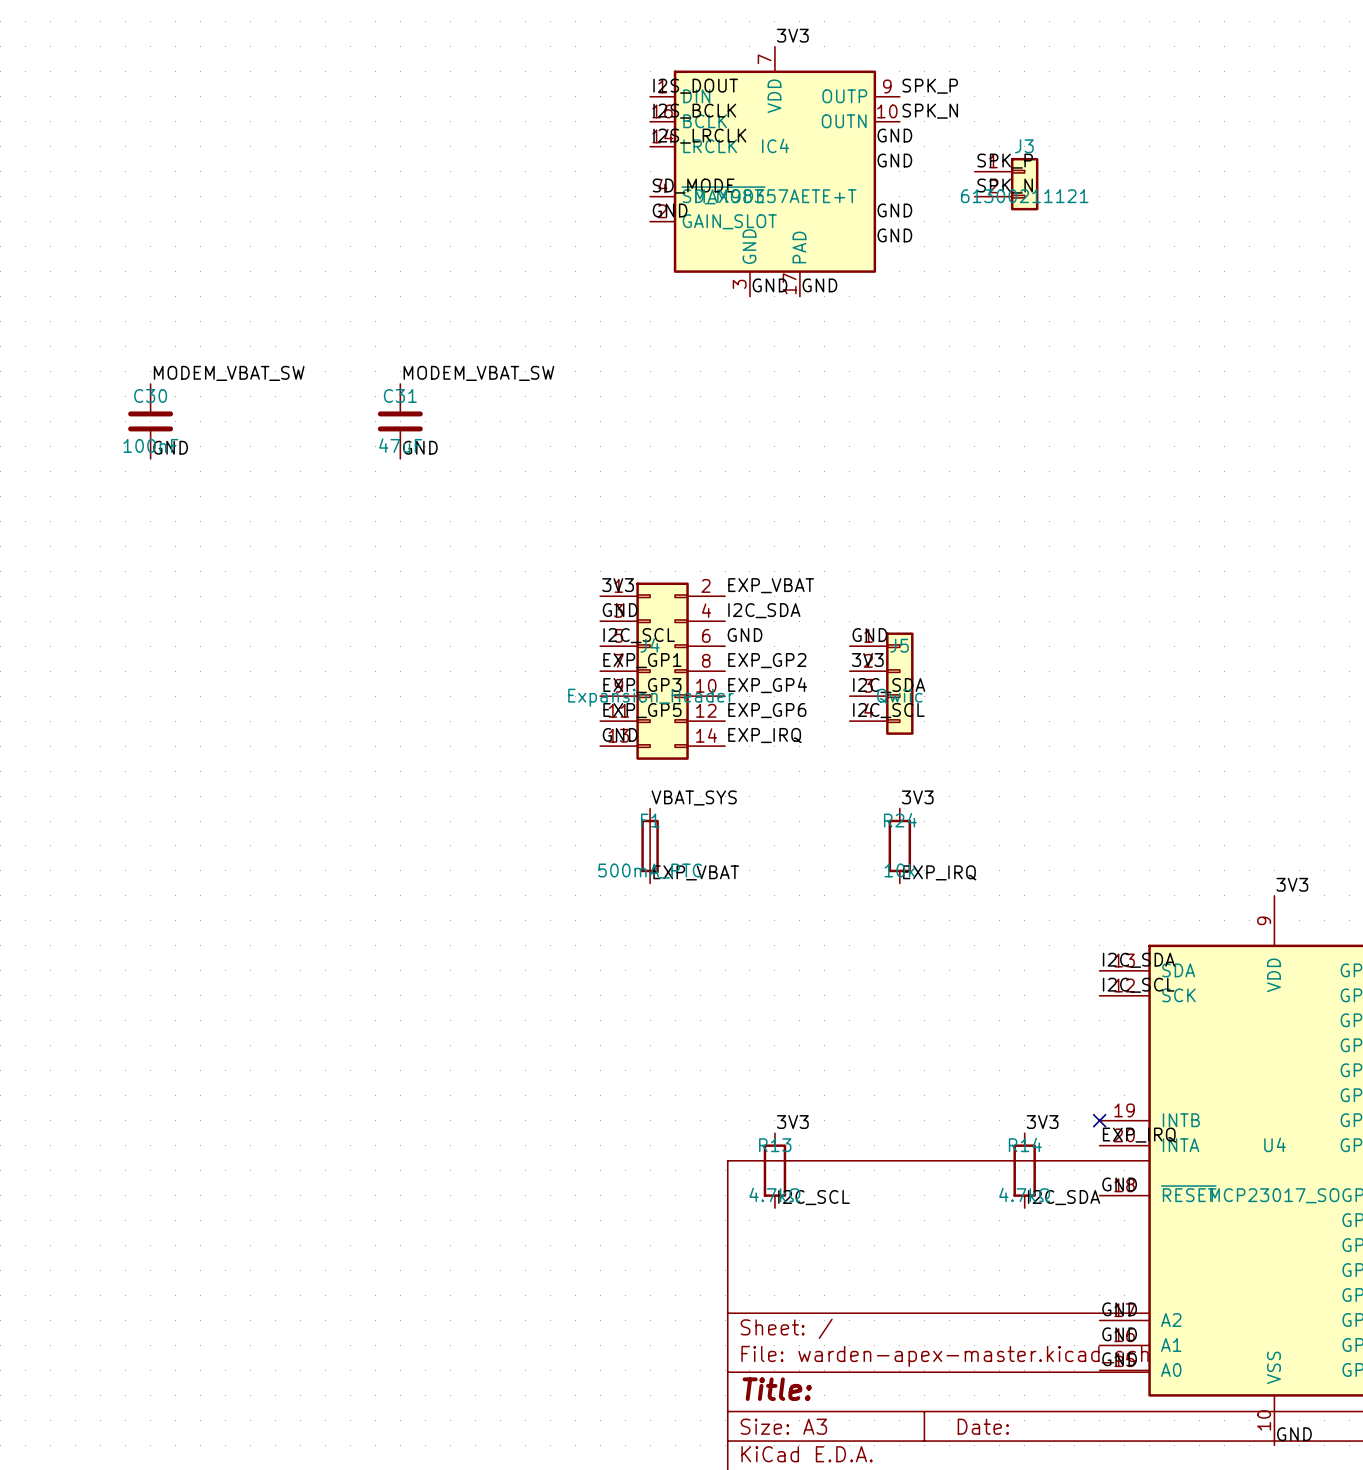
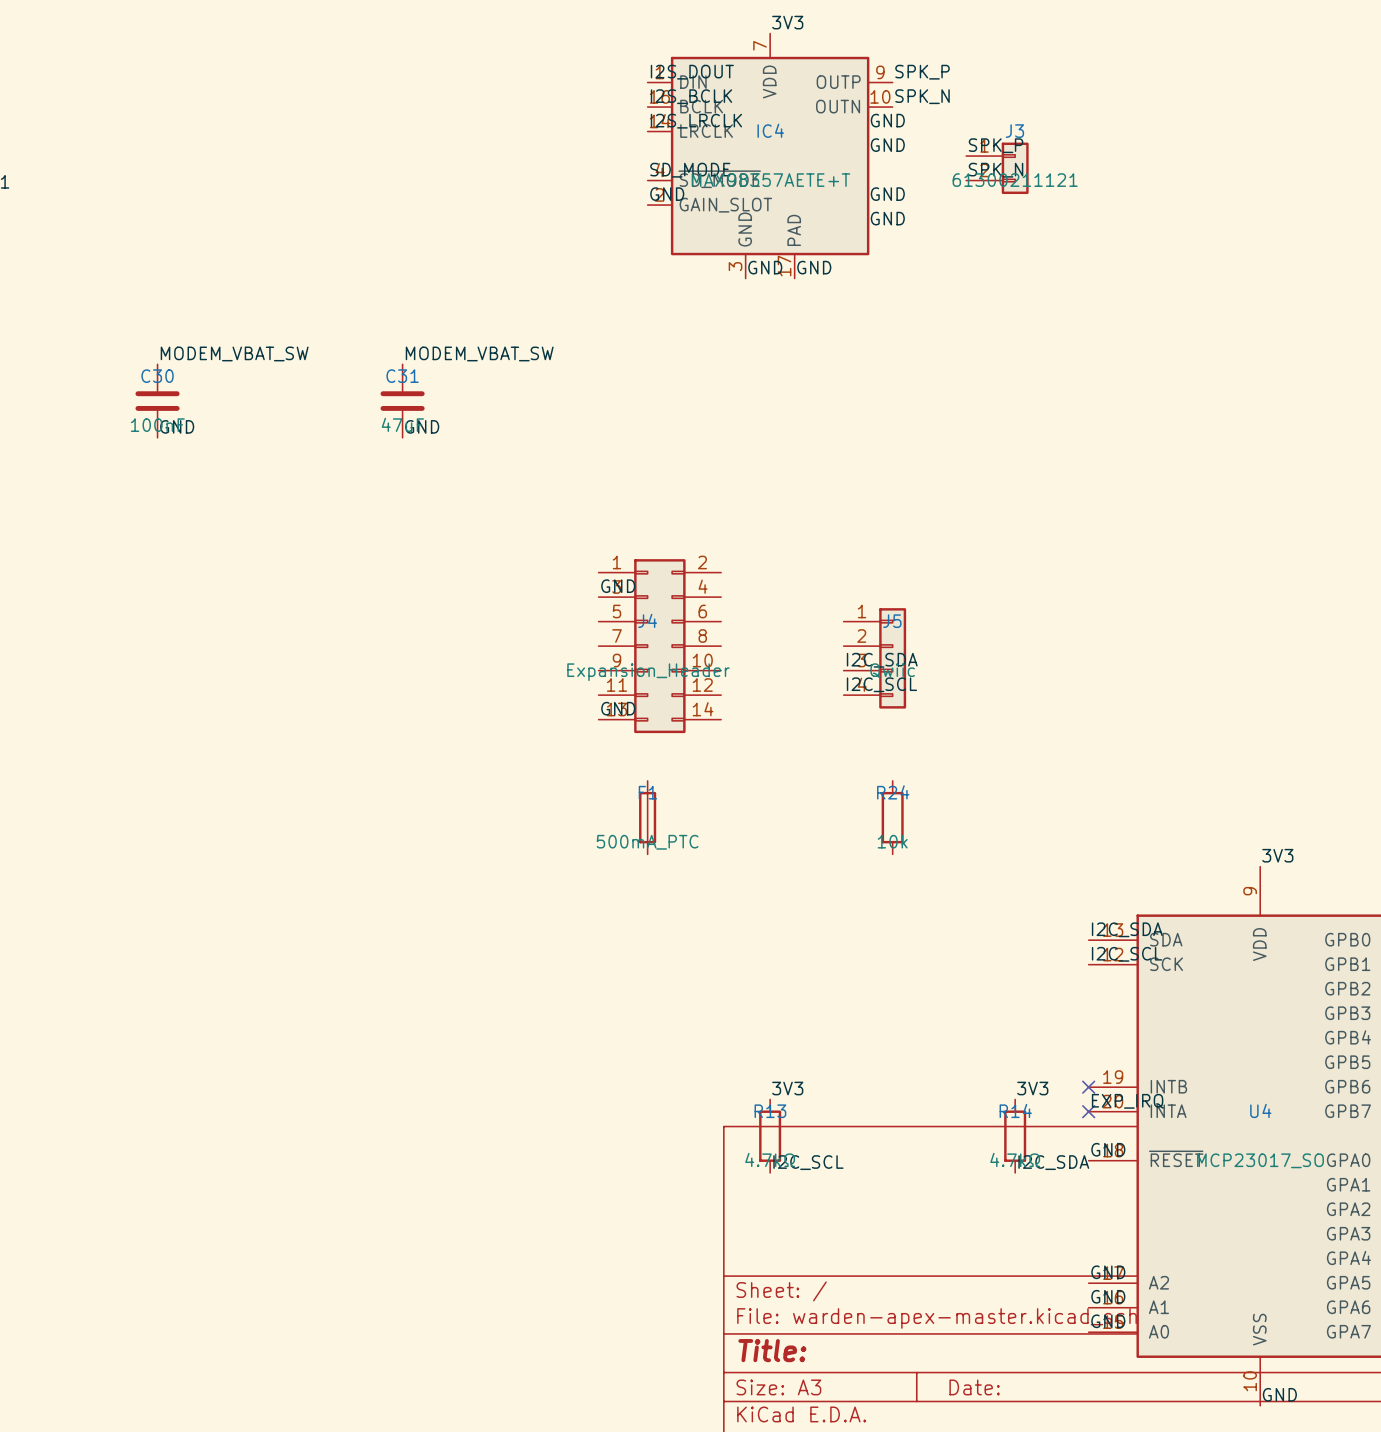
label: 3V3 (618, 585) -> none
label: EXP_VBAT (771, 585) -> none
label: I2C_SDA (764, 610) -> none
label: I2C_SCL (639, 635) -> none
label: GND (745, 635) -> none
label: GND (869, 635) -> none
label: EXP_GP1 (642, 660) -> none
label: EXP_GP2 (767, 660) -> none
label: 3V3 (867, 660) -> none
label: EXP_GP3 (642, 685) -> none
label: EXP_GP4 (767, 685) -> none
label: EXP_GP5 (642, 710) -> none
label: EXP_GP6 (767, 710) -> none
label: EXP_IRQ (764, 735) -> none
label: VBAT_SYS (694, 797) -> none
label: 3V3 (917, 797) -> none
label: EXP_VBAT (696, 872) -> none
label: EXP_IRQ (939, 872) -> none
no-connect mark: none -> (1088, 1111)

